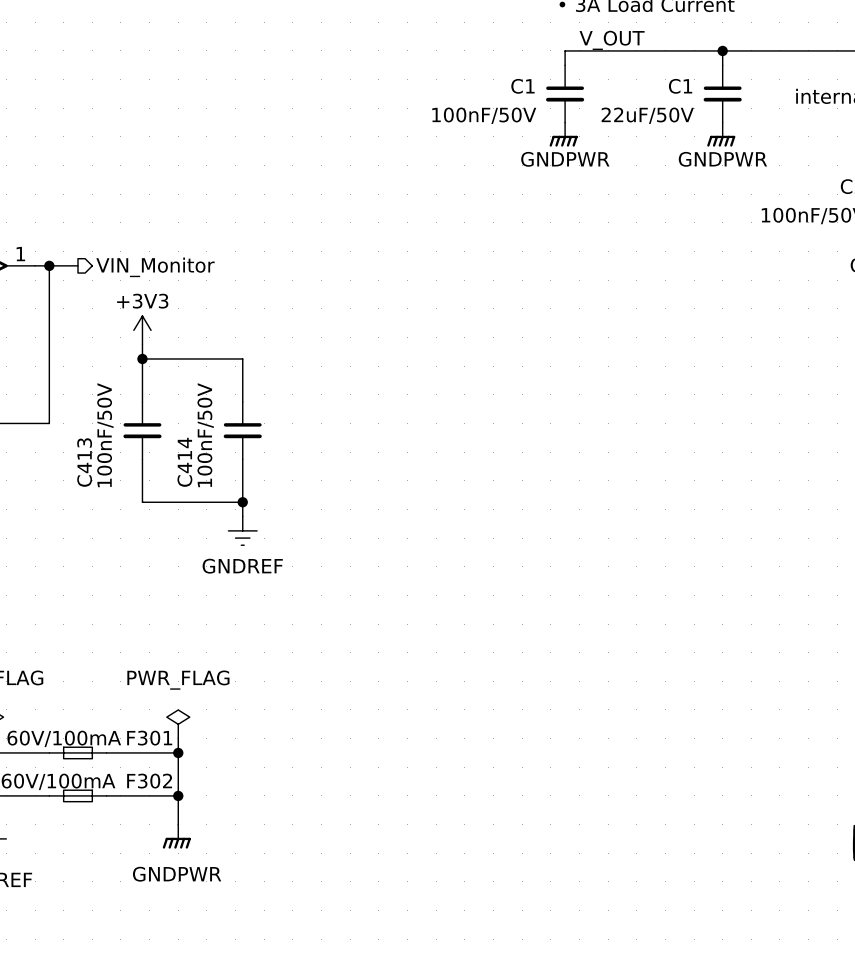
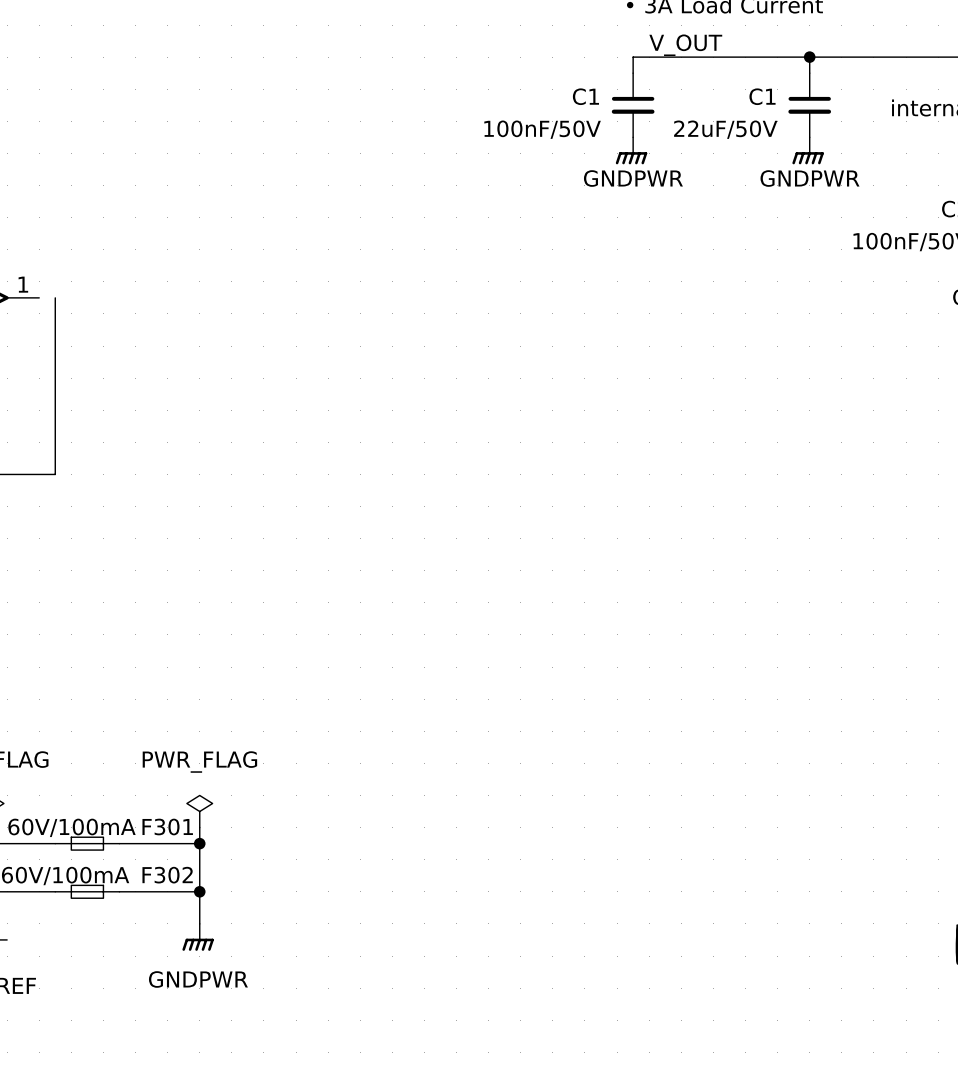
wire: (35, 265) (77, 265) -> none
junction: (49, 265) -> none
hierarchical label: VIN_Monitor (155, 267) -> none
power symbol: +3V3 (142, 330) -> none
wire: (142, 344) (142, 401) -> none
wire: (142, 358) (242, 358) (242, 401) -> none
junction: (142, 358) -> none
C413: 100nF/50V (142, 430) -> none
C414: 100nF/50V (242, 430) -> none
wire: (142, 459) (142, 502) (242, 502) -> none
wire: (242, 459) (242, 516) -> none
junction: (242, 502) -> none
power symbol: GNDREF (242, 530) -> none

